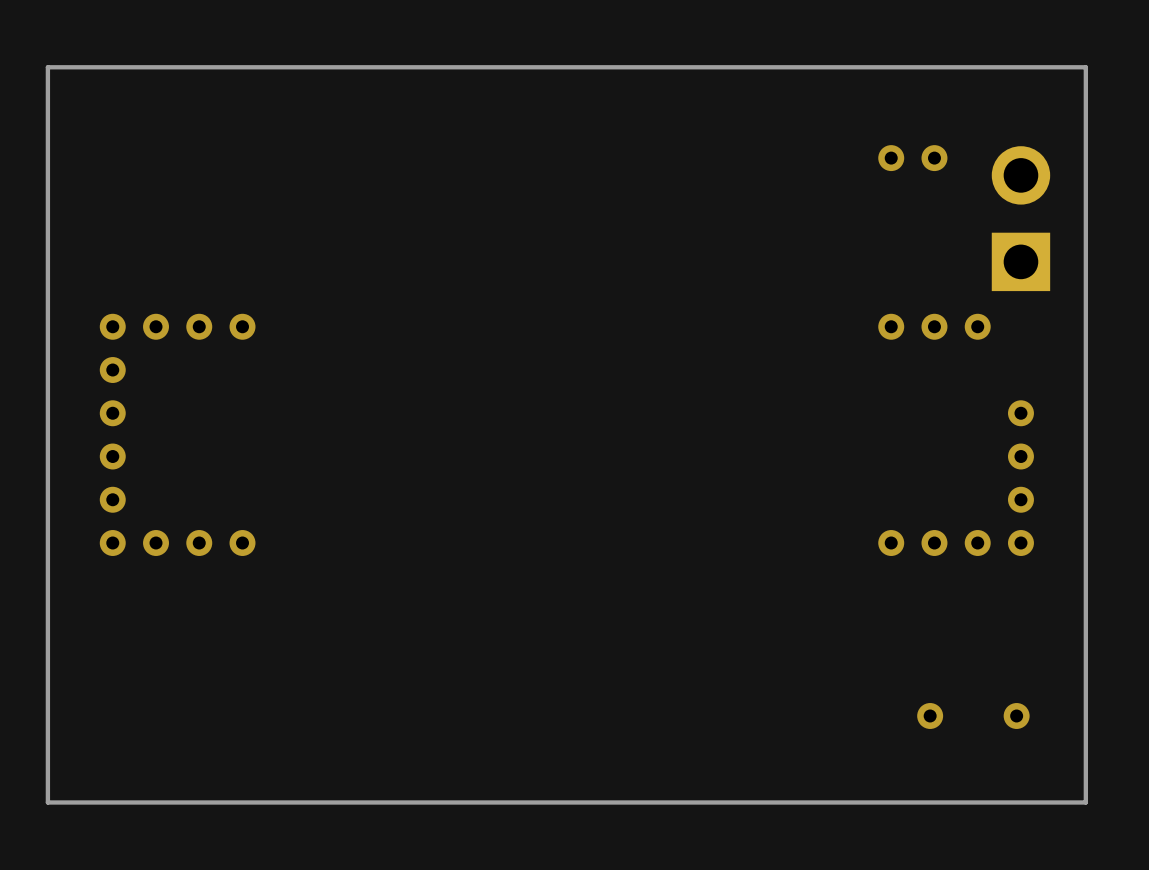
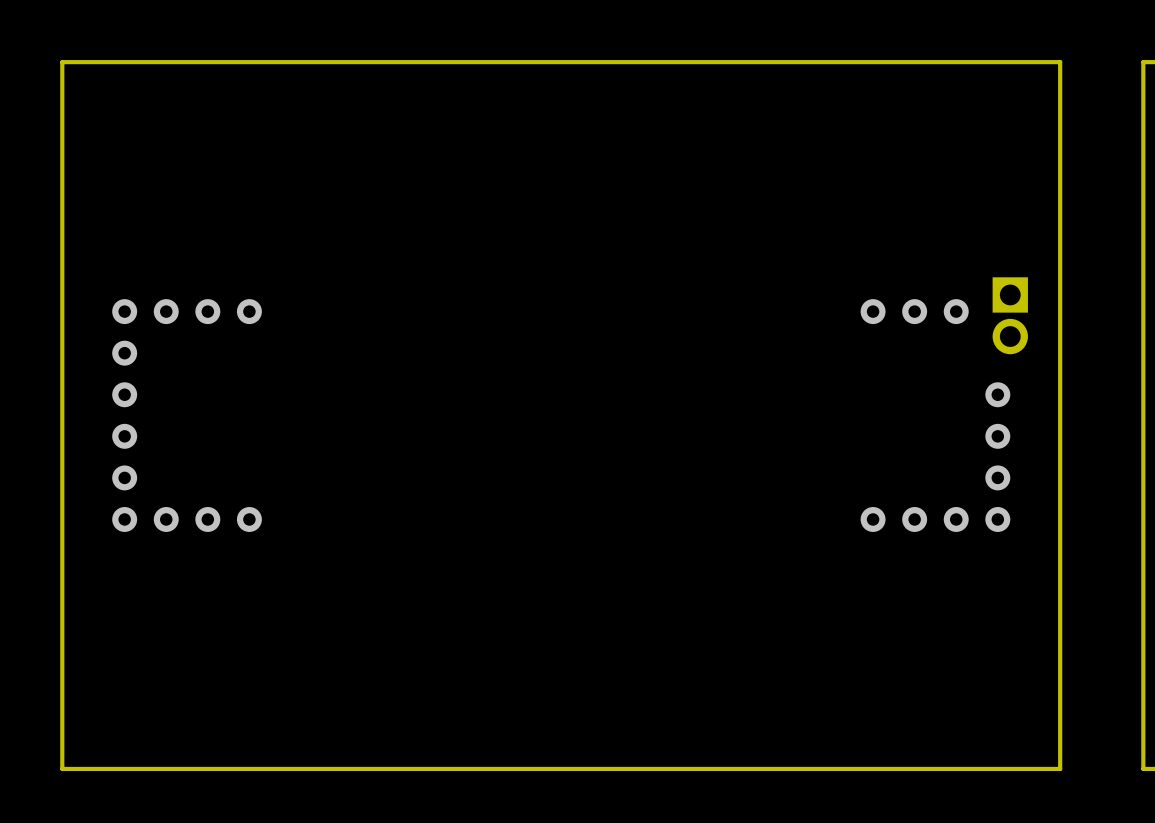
via: (891, 158) -> none
via: (934, 158) -> none
part: (1020, 218) -> none
part: none -> (1010, 315)
via: (930, 715) -> none
via: (1016, 715) -> none

